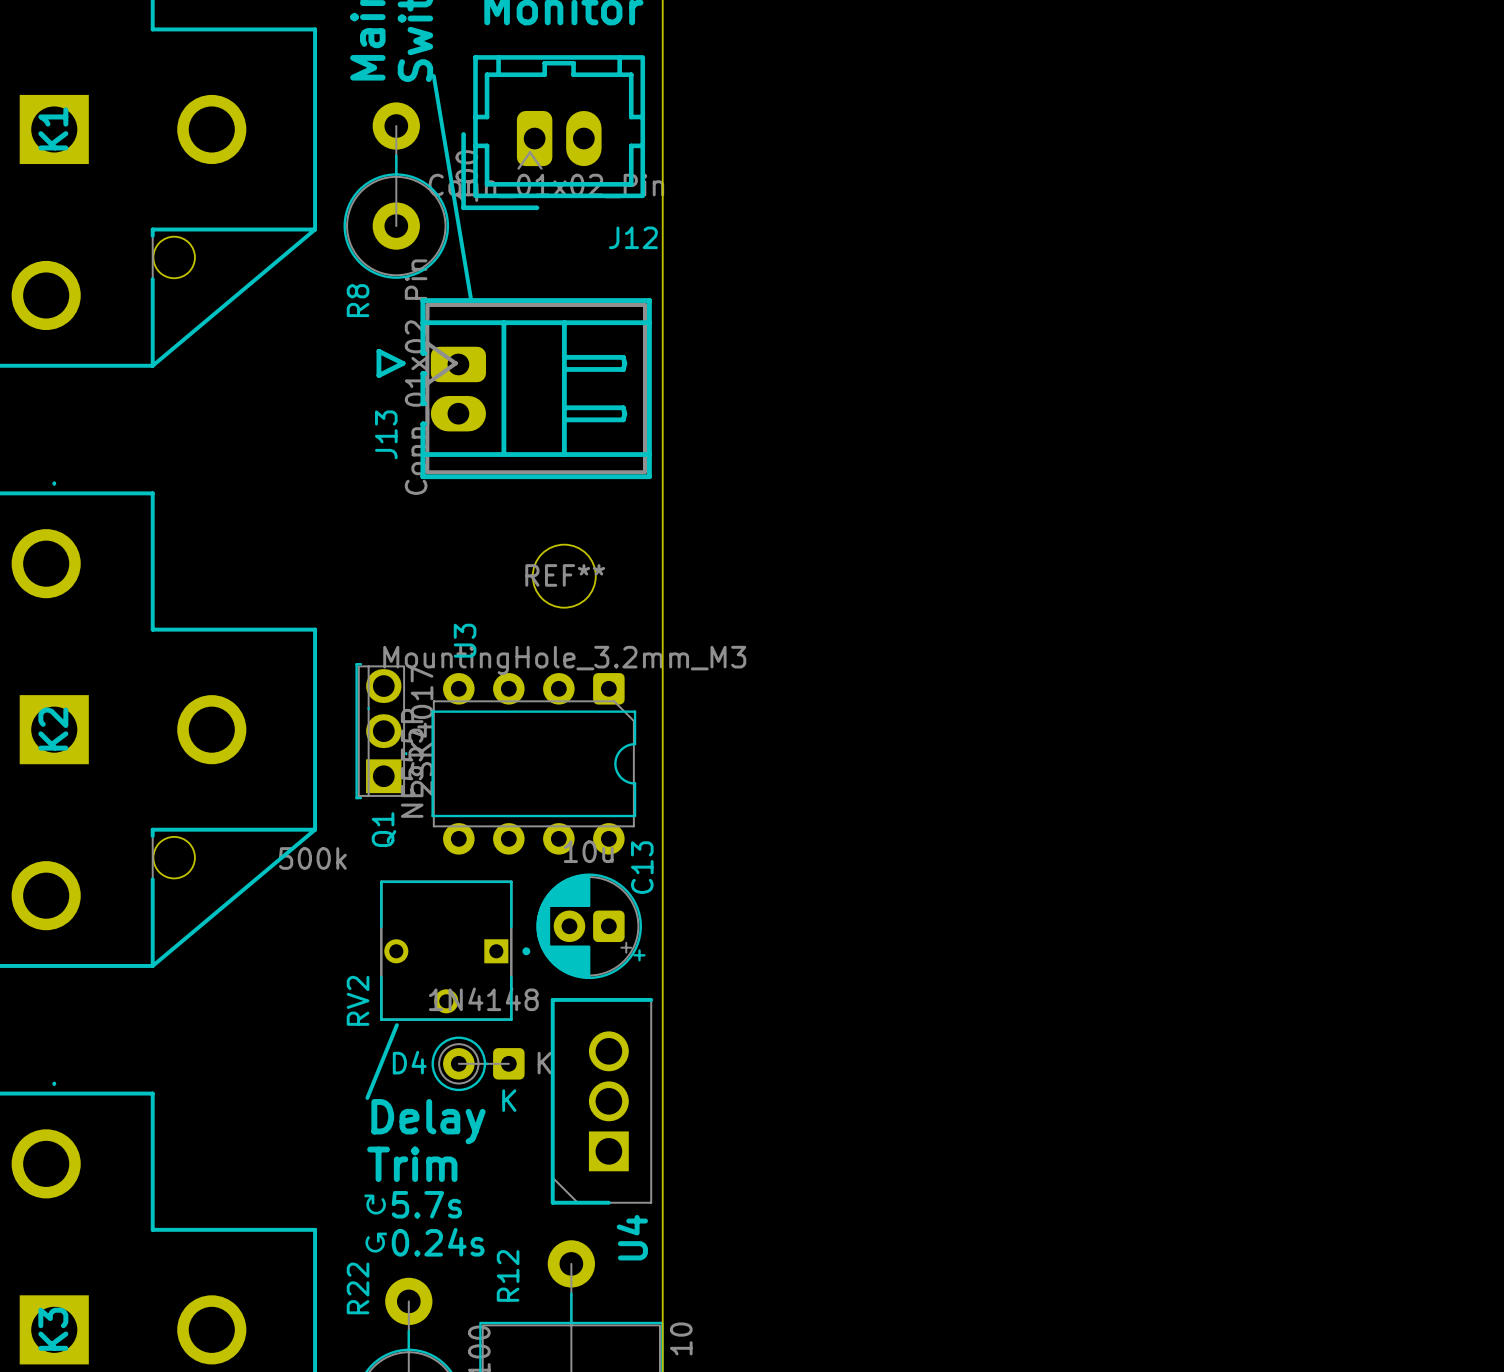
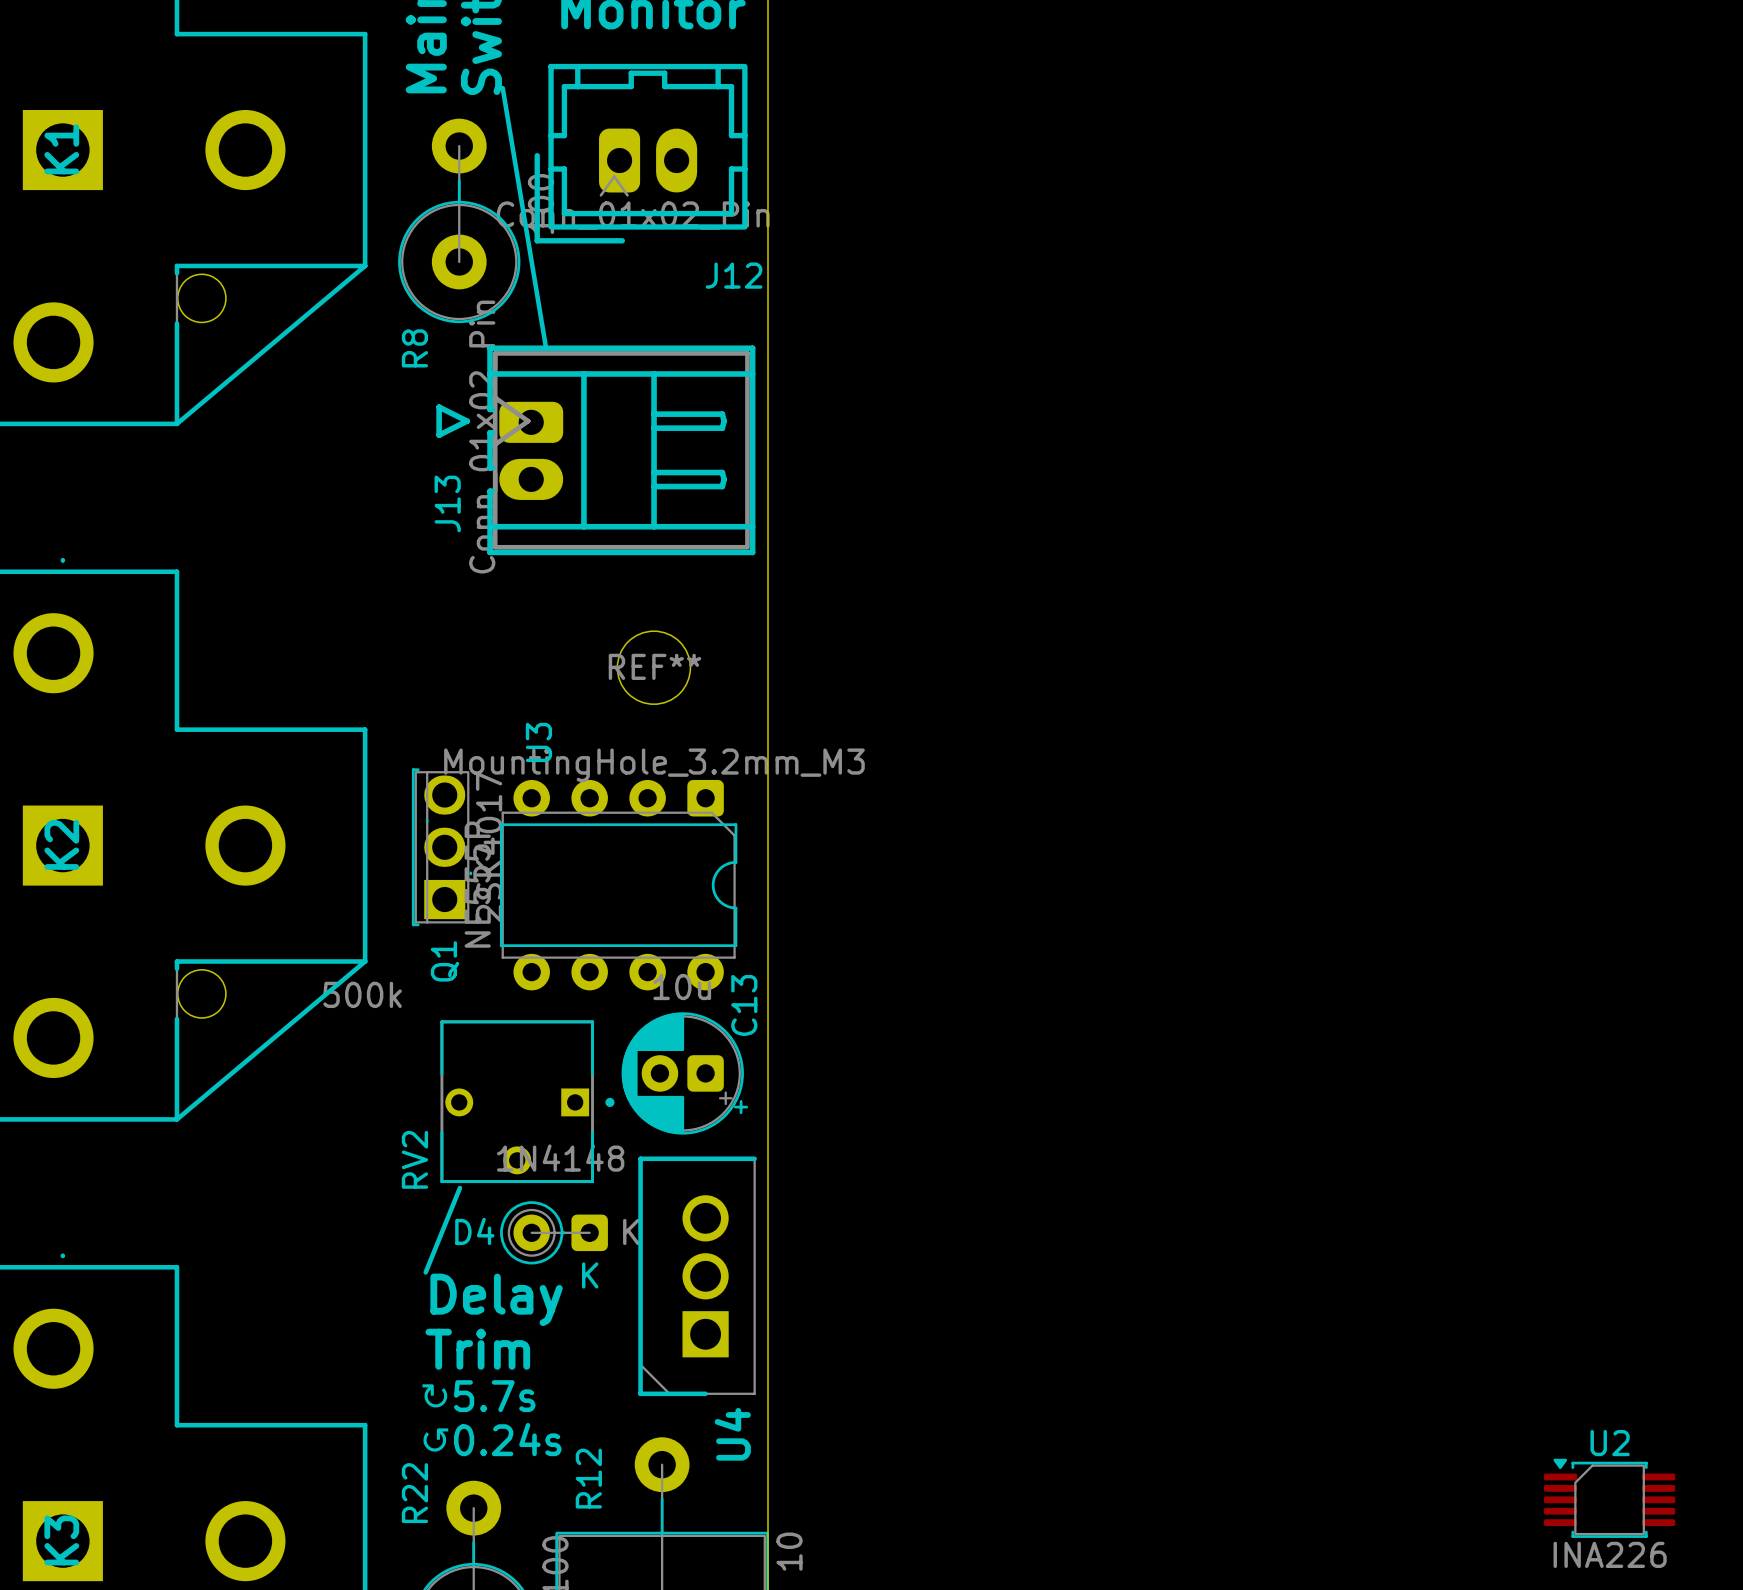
U2: none -> INA226 (1609, 1498)

